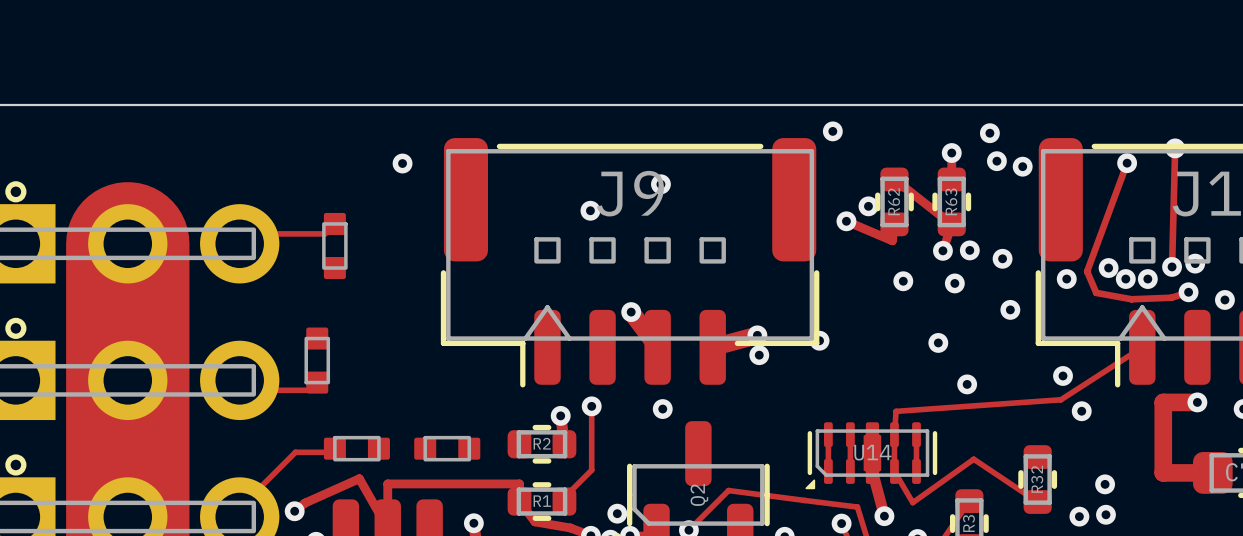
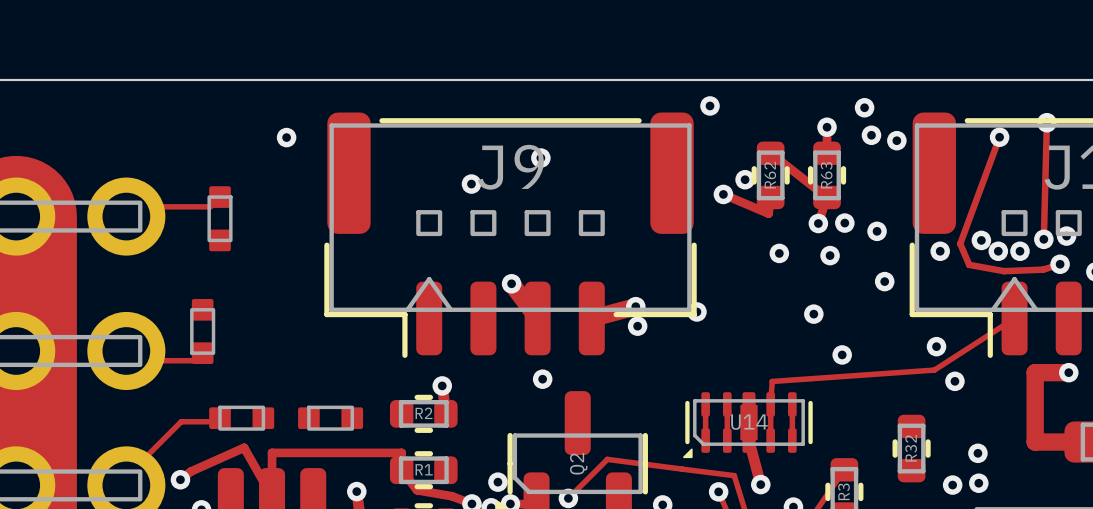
track: (591, 406) (591, 470) (571, 490) -> none
via: (591, 406) -> none
track: (894, 471) (912, 502) (973, 459) (1037, 501) -> none

